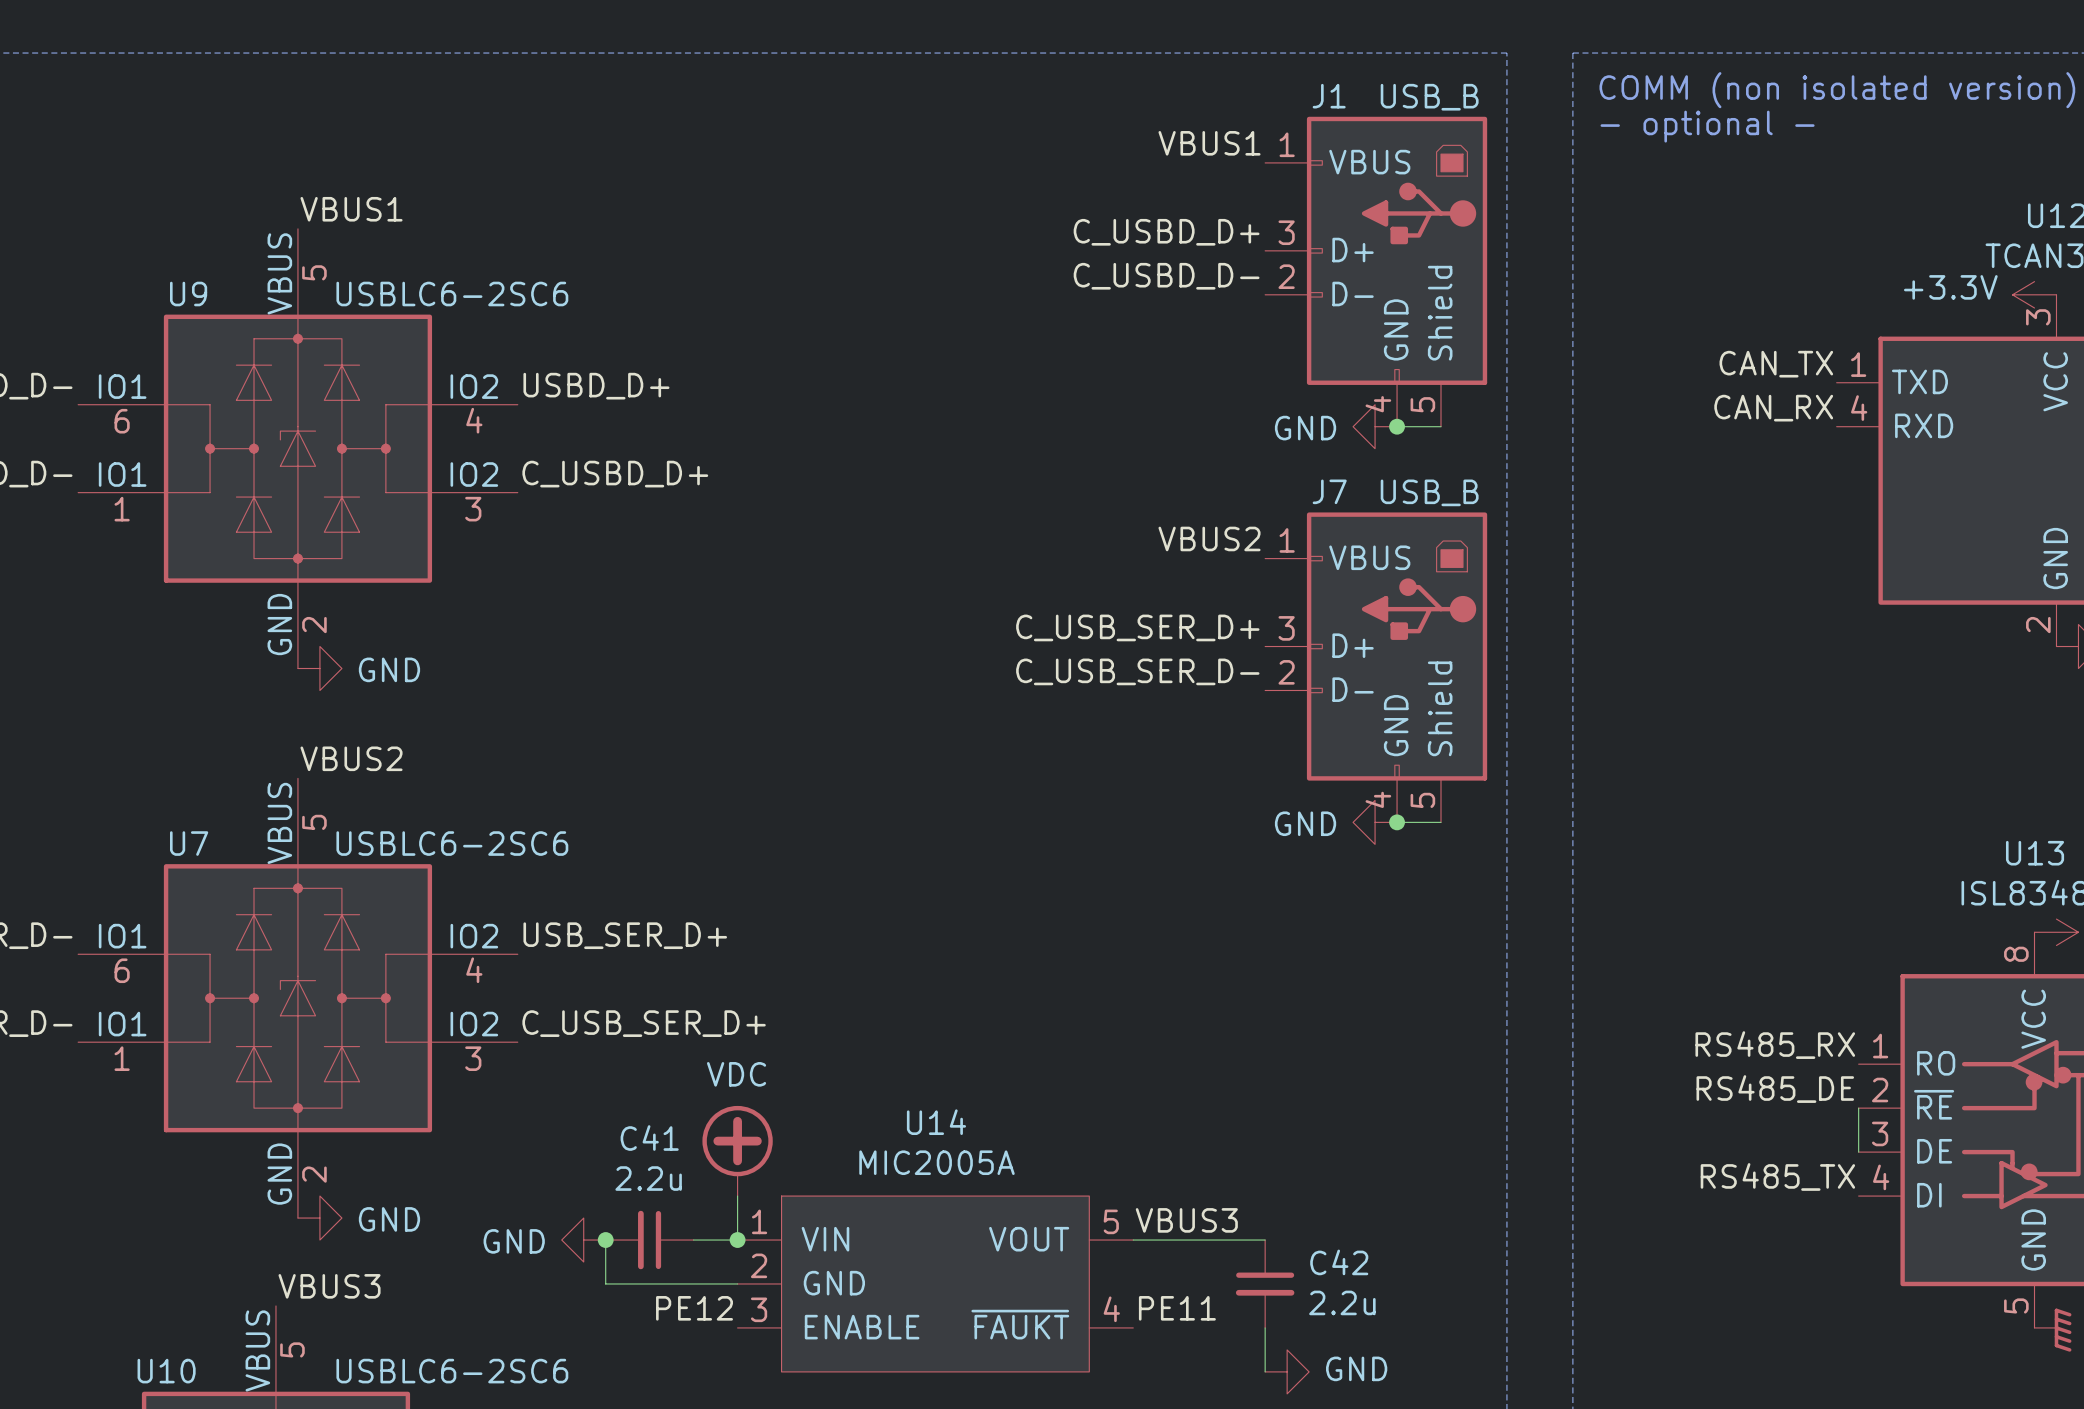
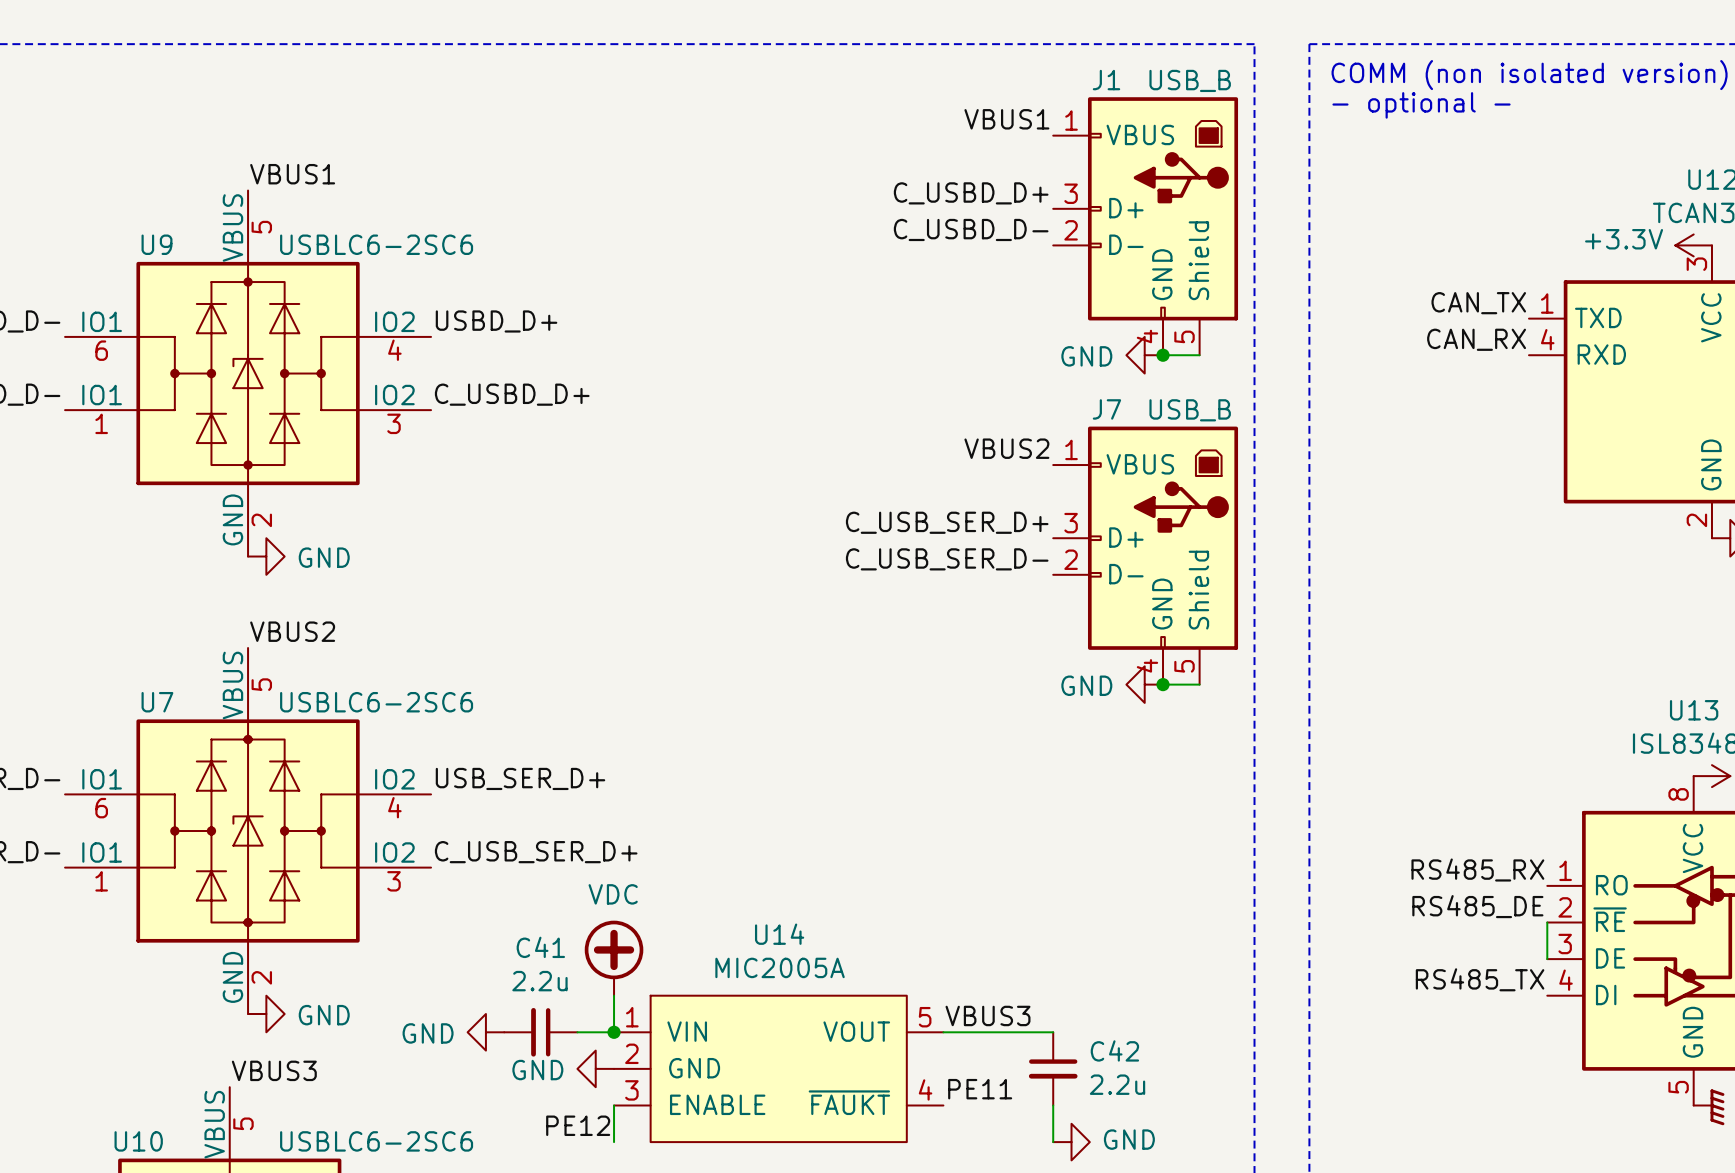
wire: (605, 1240) (605, 1283) (737, 1283) -> none
junction: (605, 1240) -> none
power symbol: none -> GND (595, 1068)
label position: PE12 (694, 1308) -> PE12 (578, 1125)
wire: none -> (614, 1105) (614, 1142)

